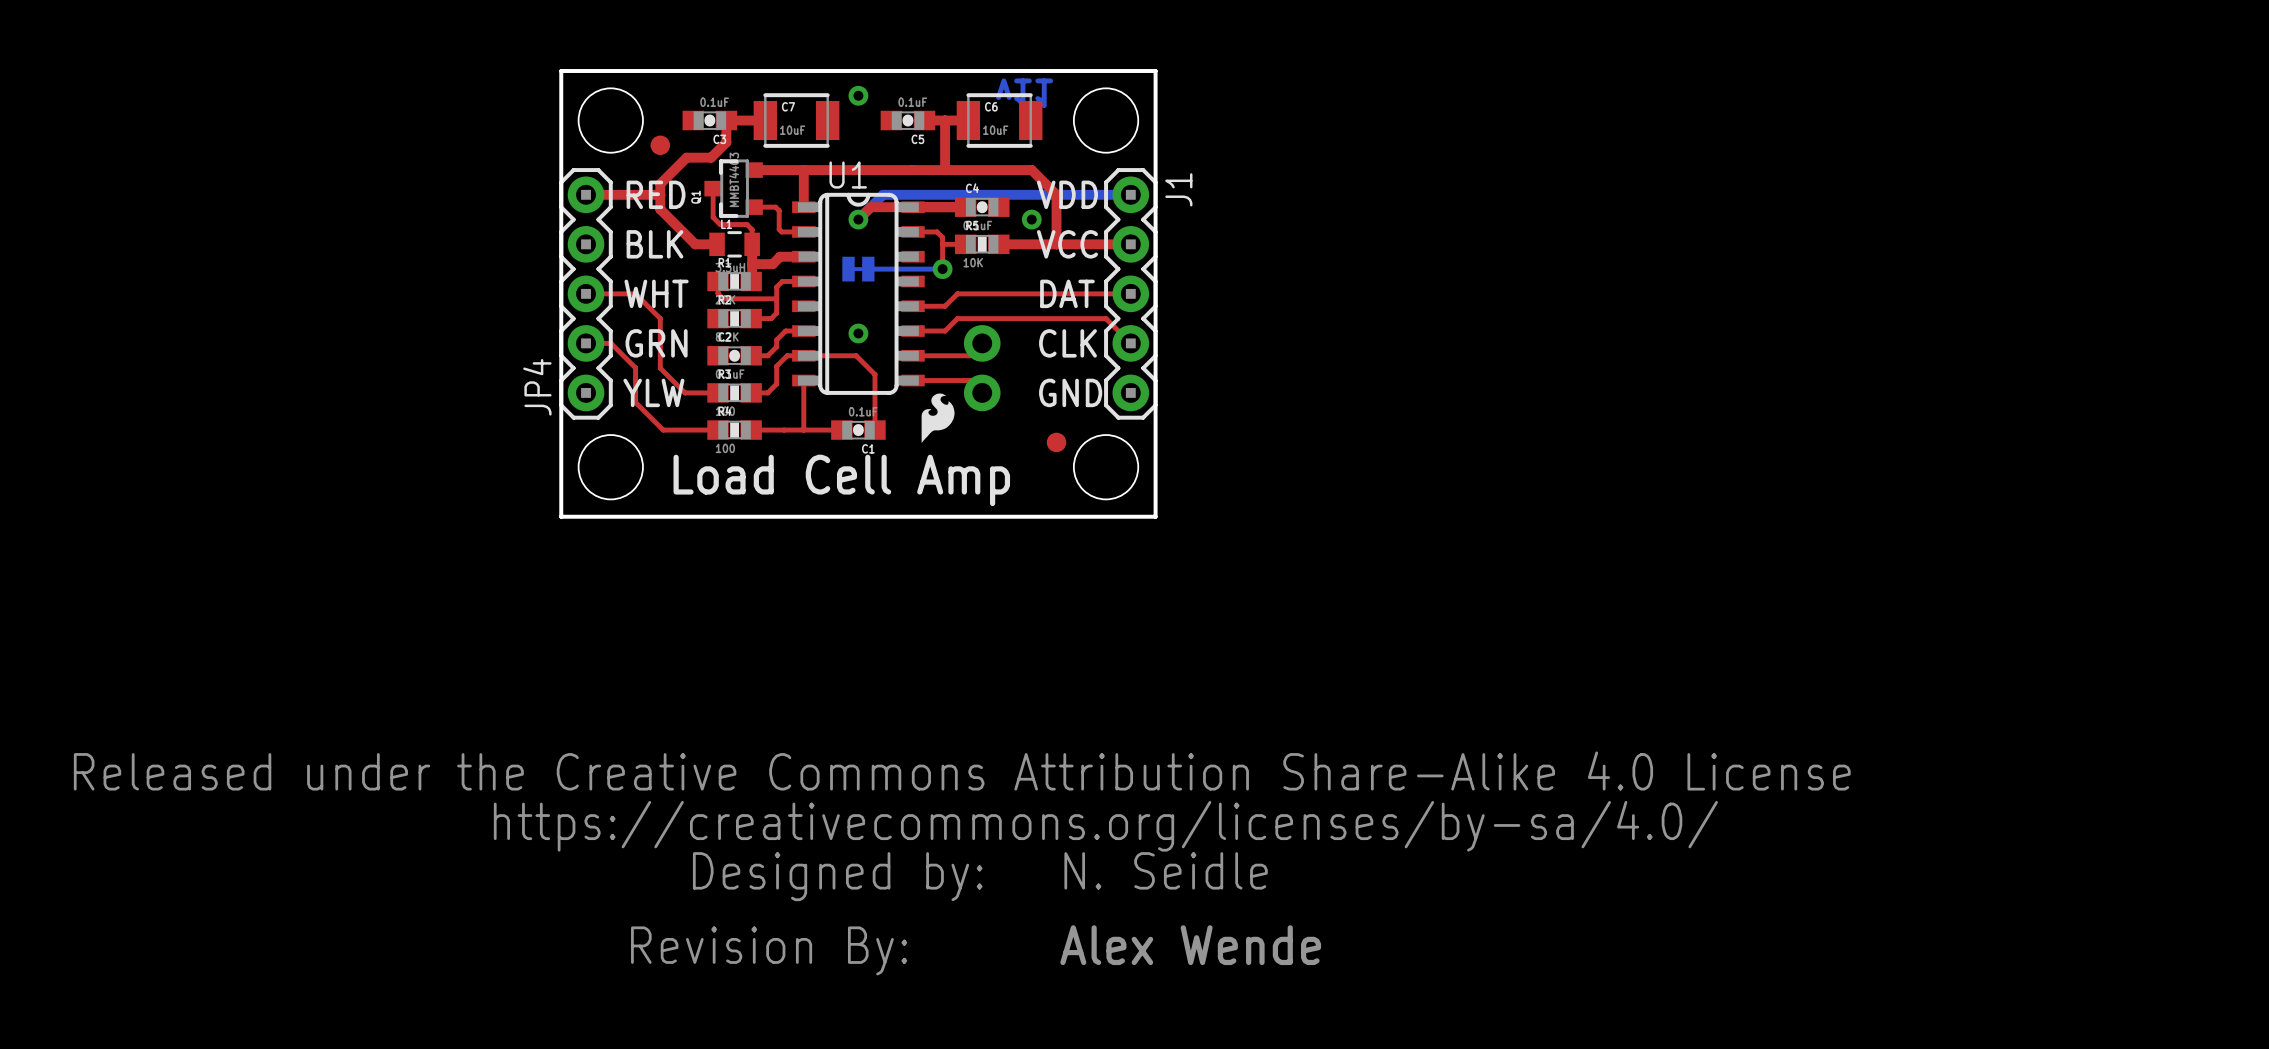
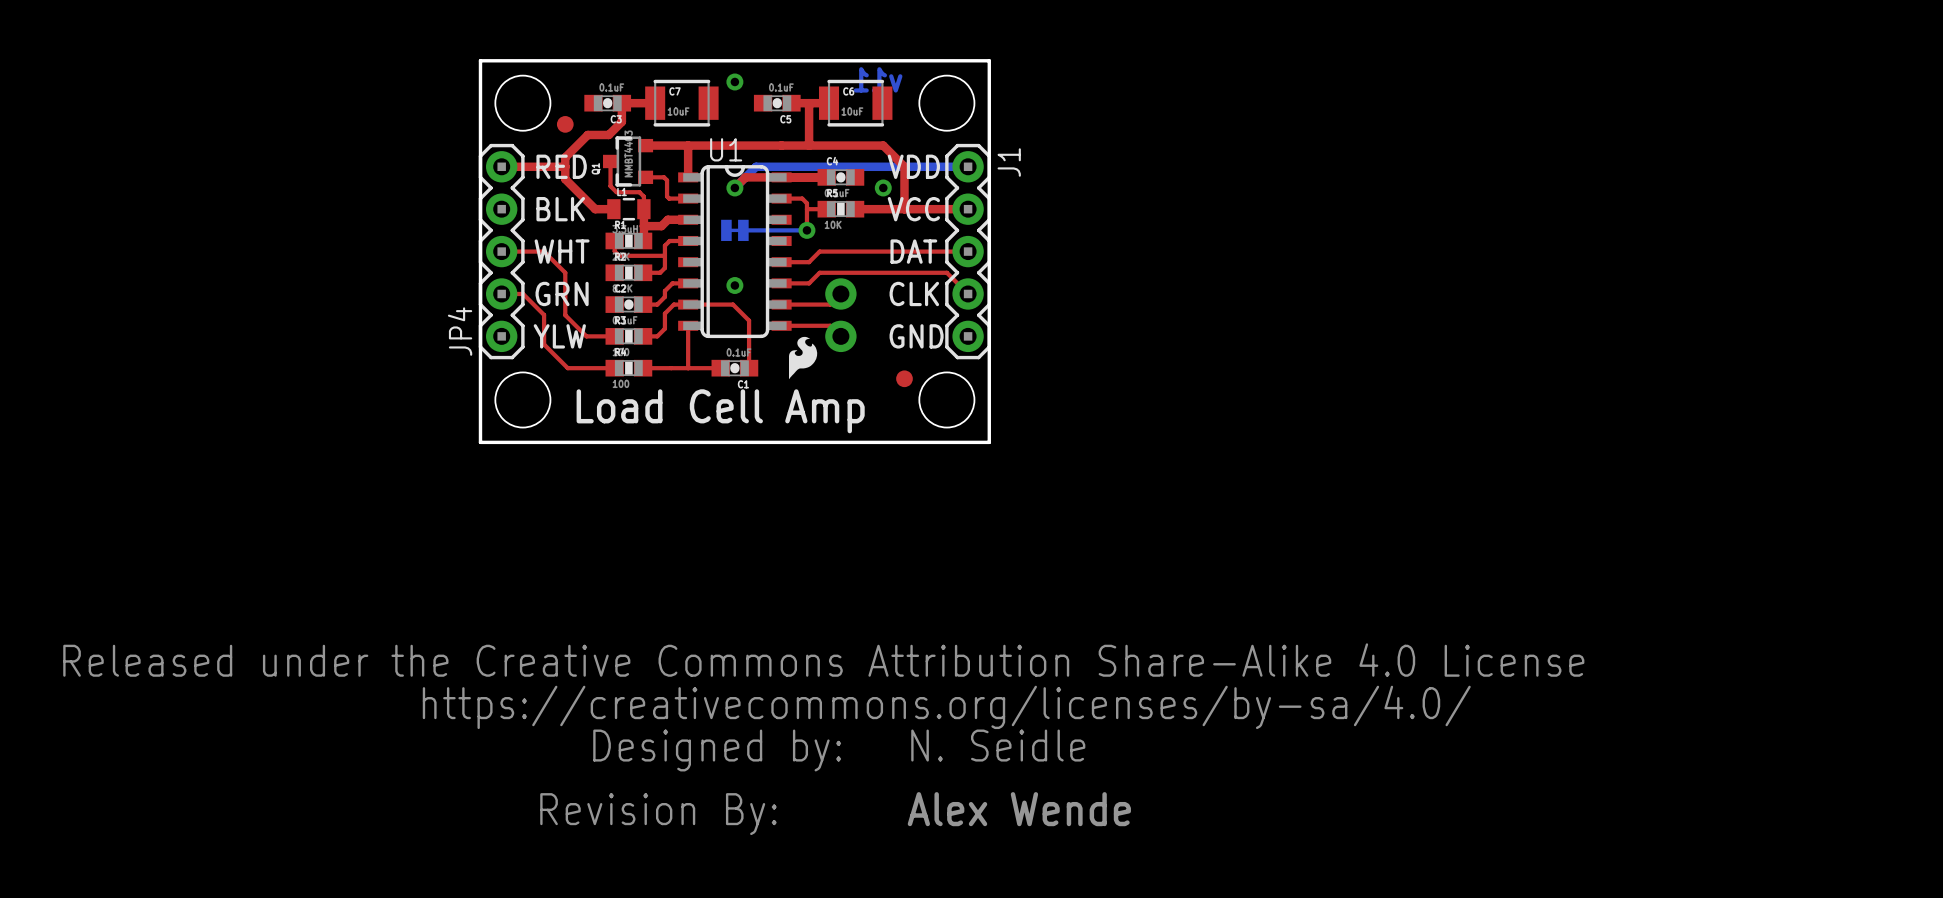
drawing shape: [73, 78, 1851, 902] -> [63, 67, 1585, 772]

